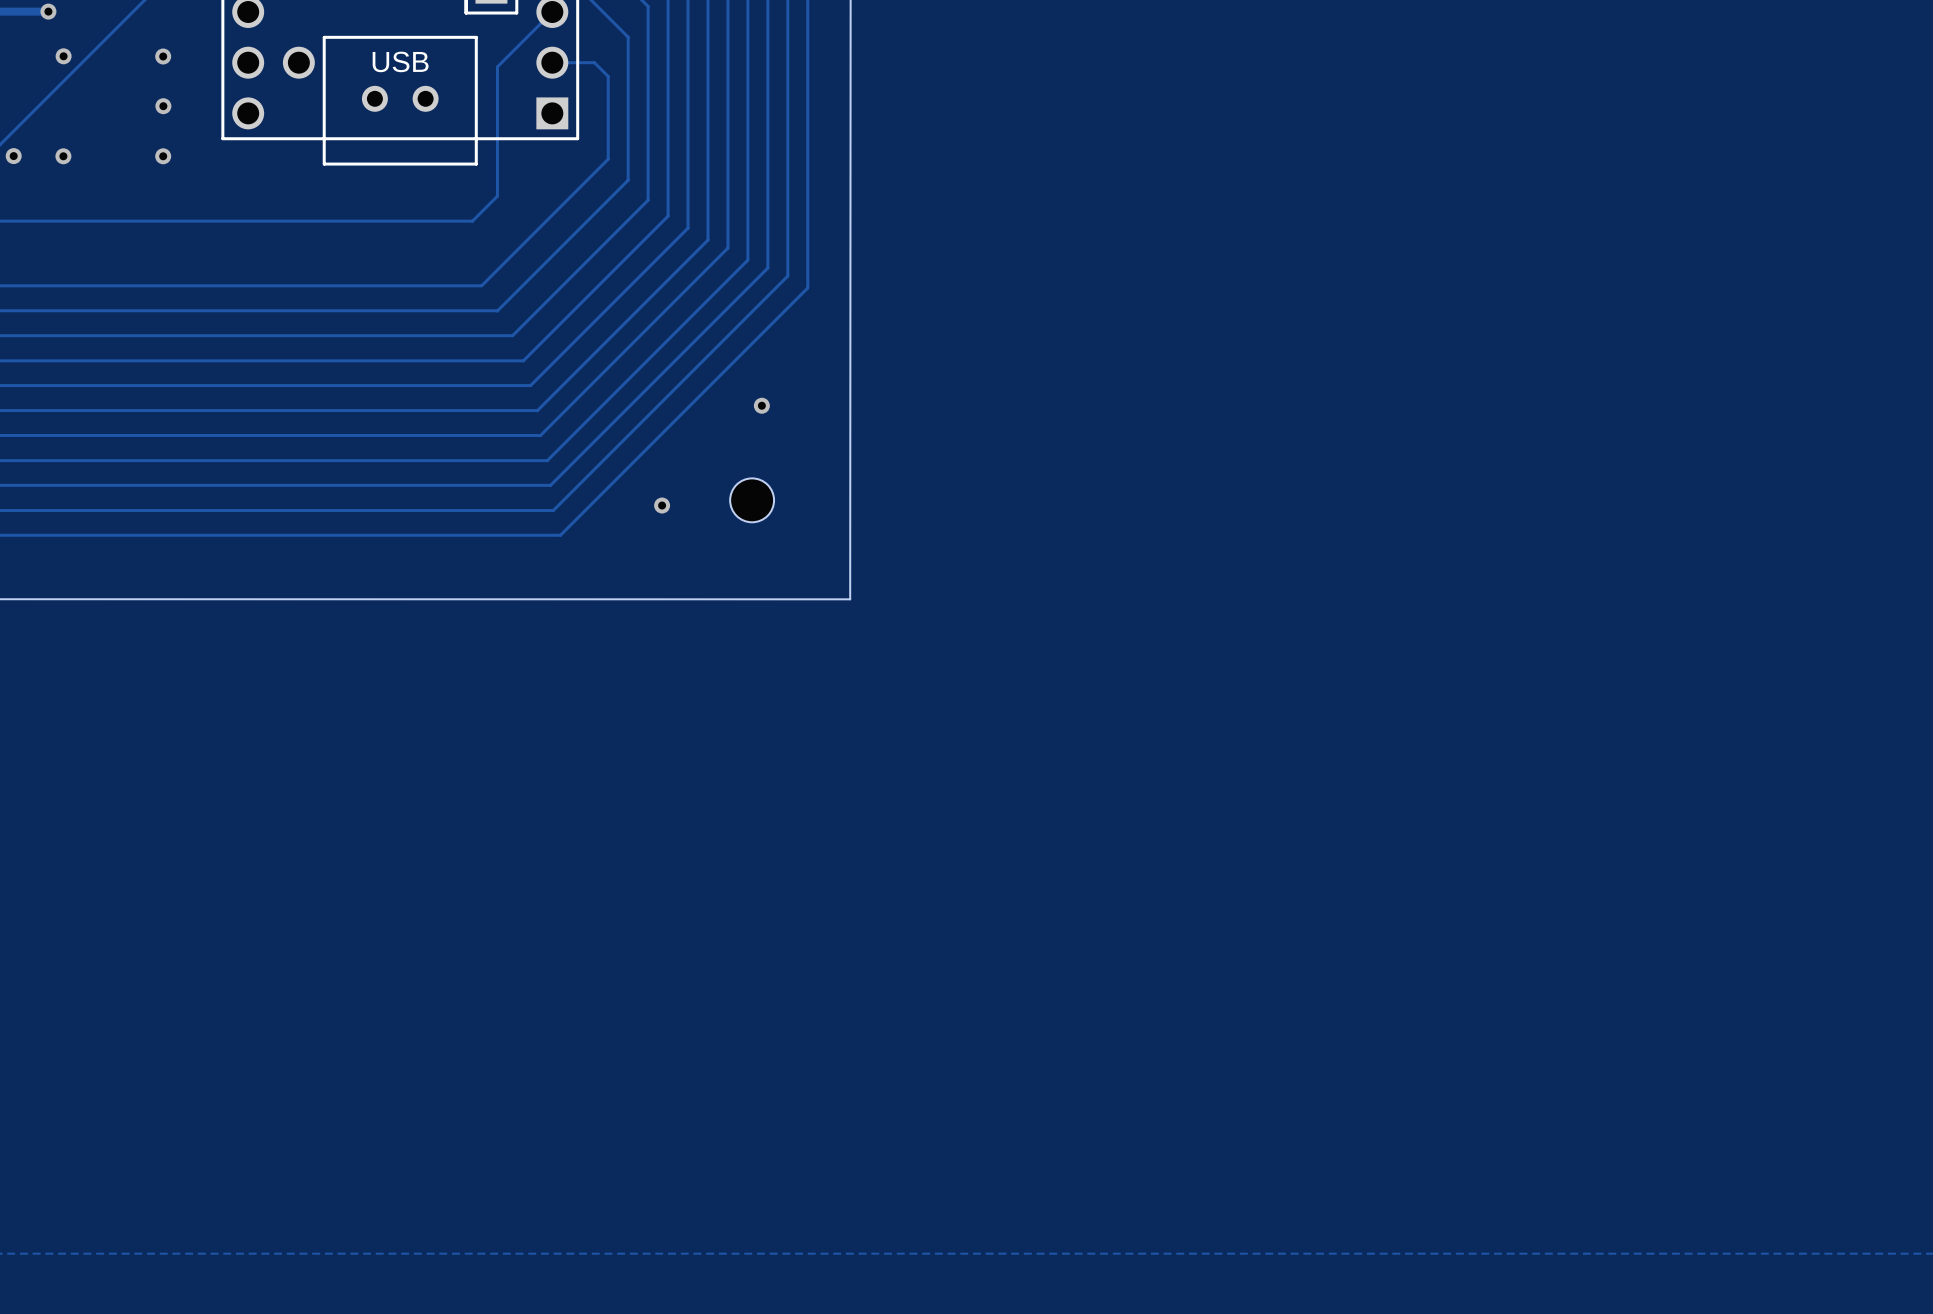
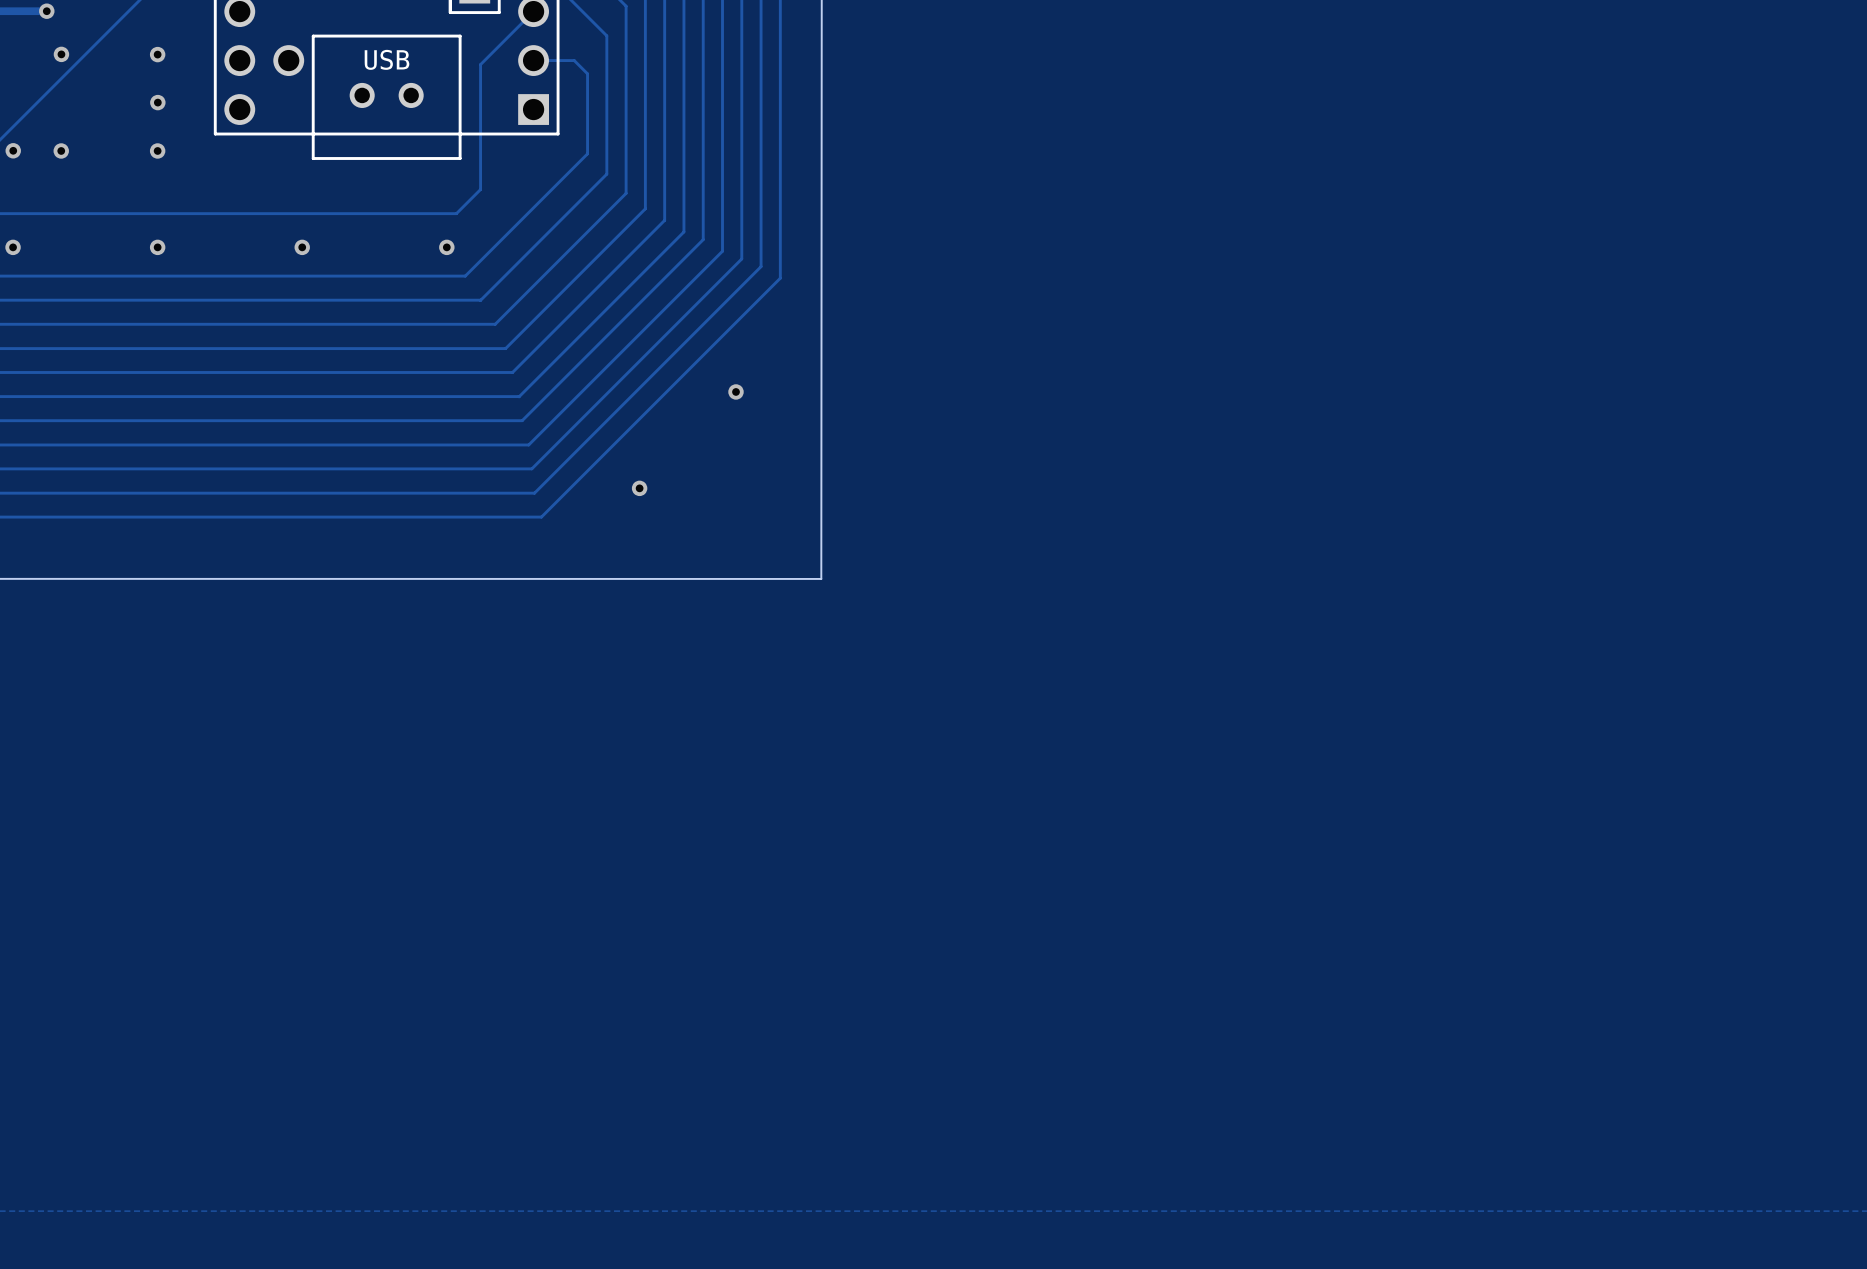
via: none -> (13, 247)
via: none -> (157, 247)
via: none -> (302, 247)
via: none -> (446, 247)
part: (752, 500) -> none

